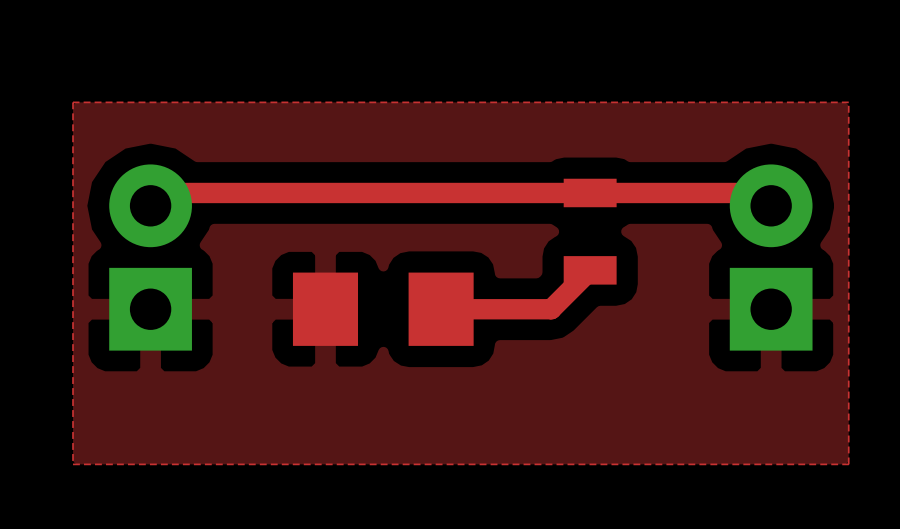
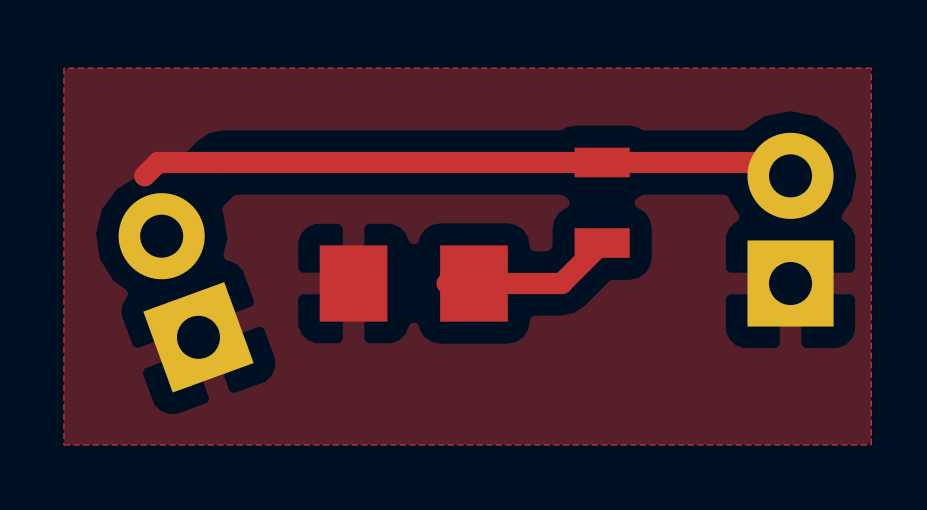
part: (150, 257) -> none
part position: (383, 309) -> (413, 283)
part: none -> (186, 292)

